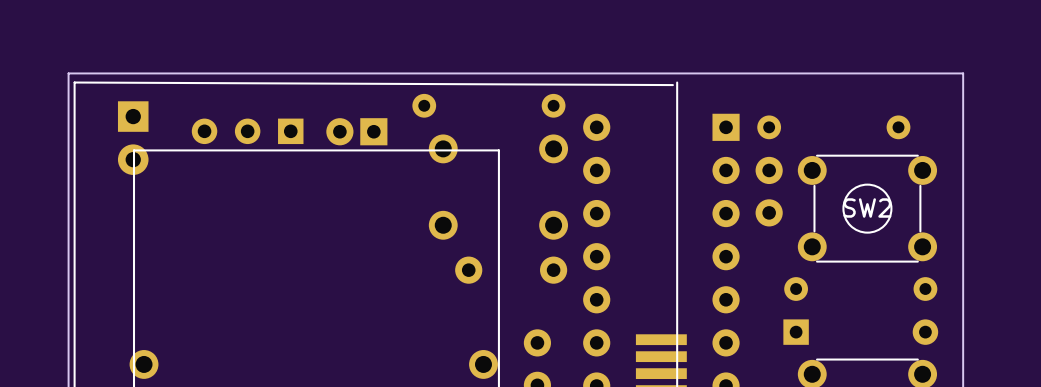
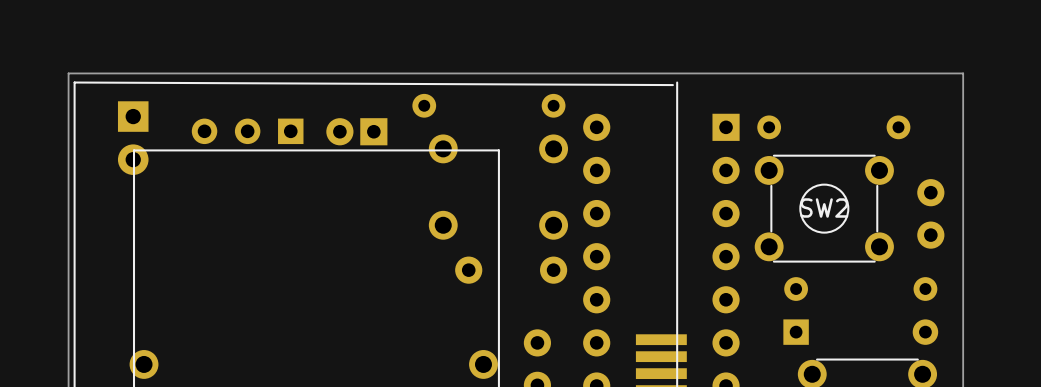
part position: (769, 191) -> (930, 213)
SW2 position: (867, 208) -> (824, 208)

